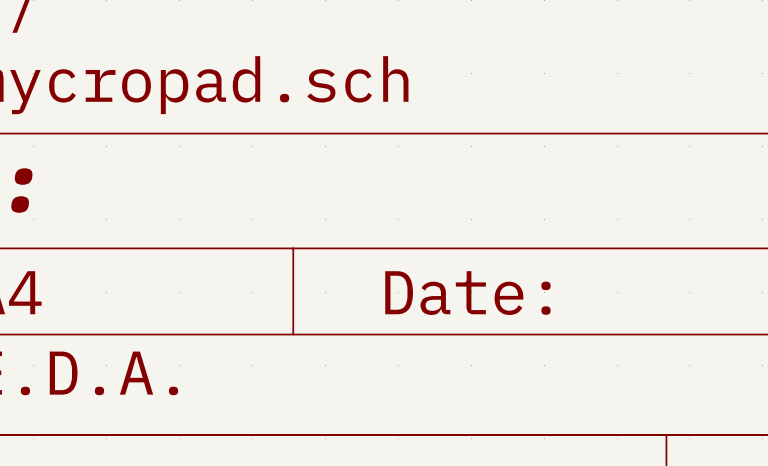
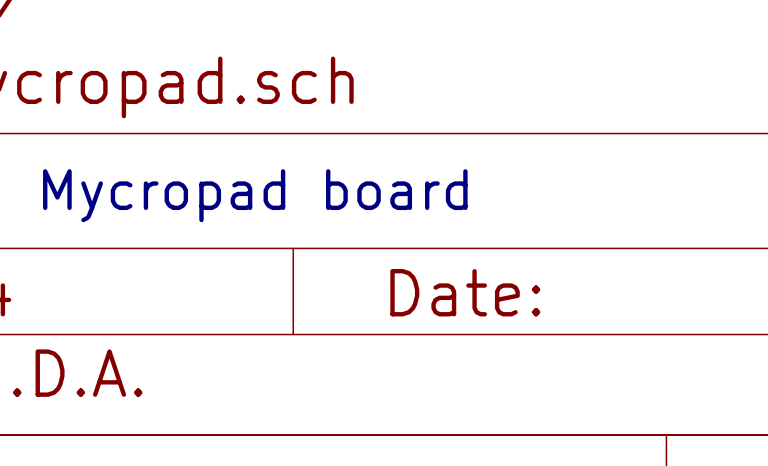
text: none -> Mycropad board (255, 195)

